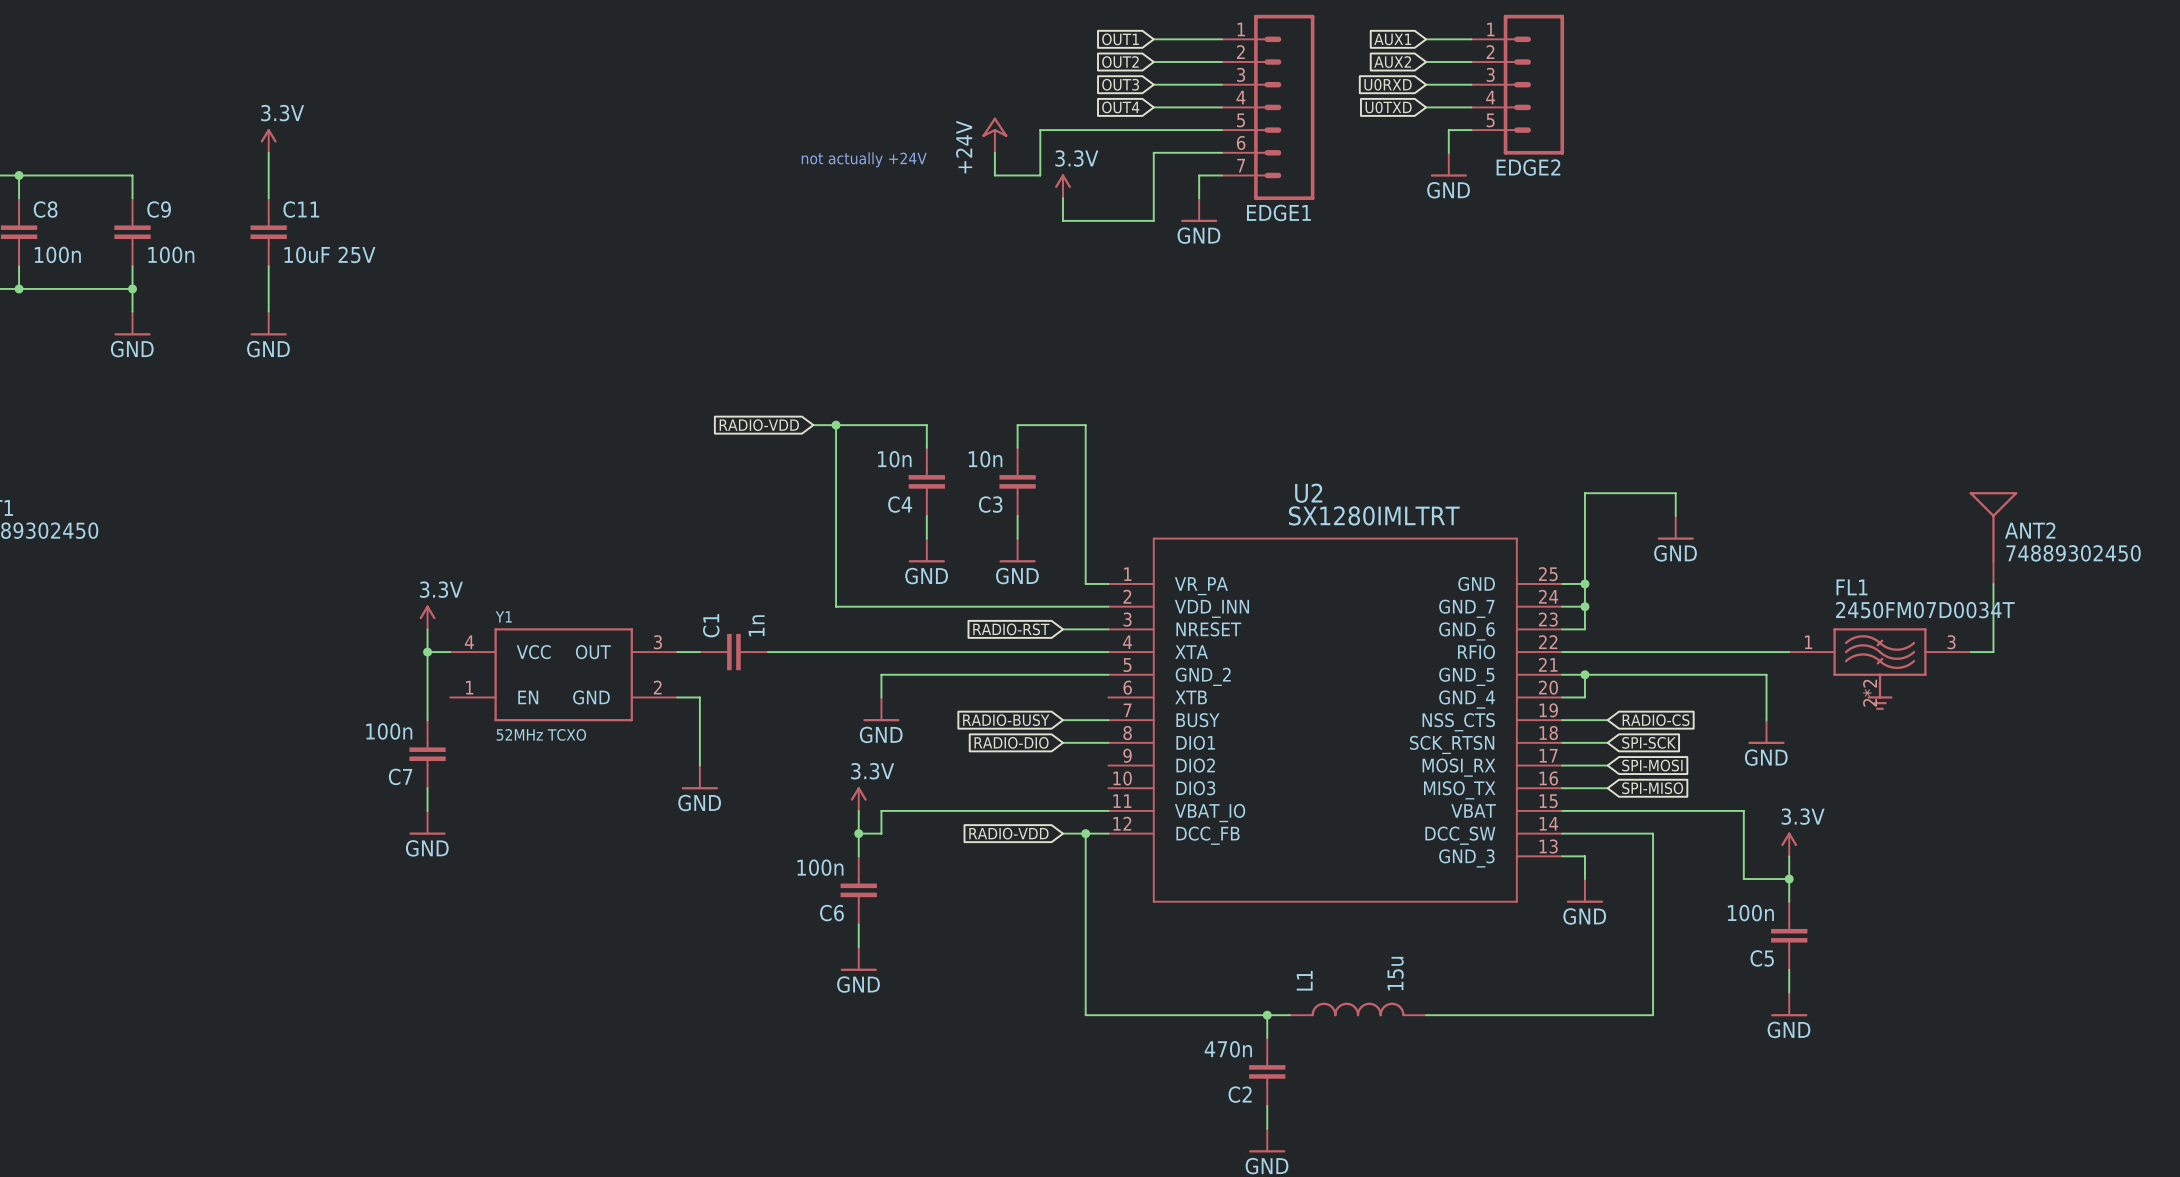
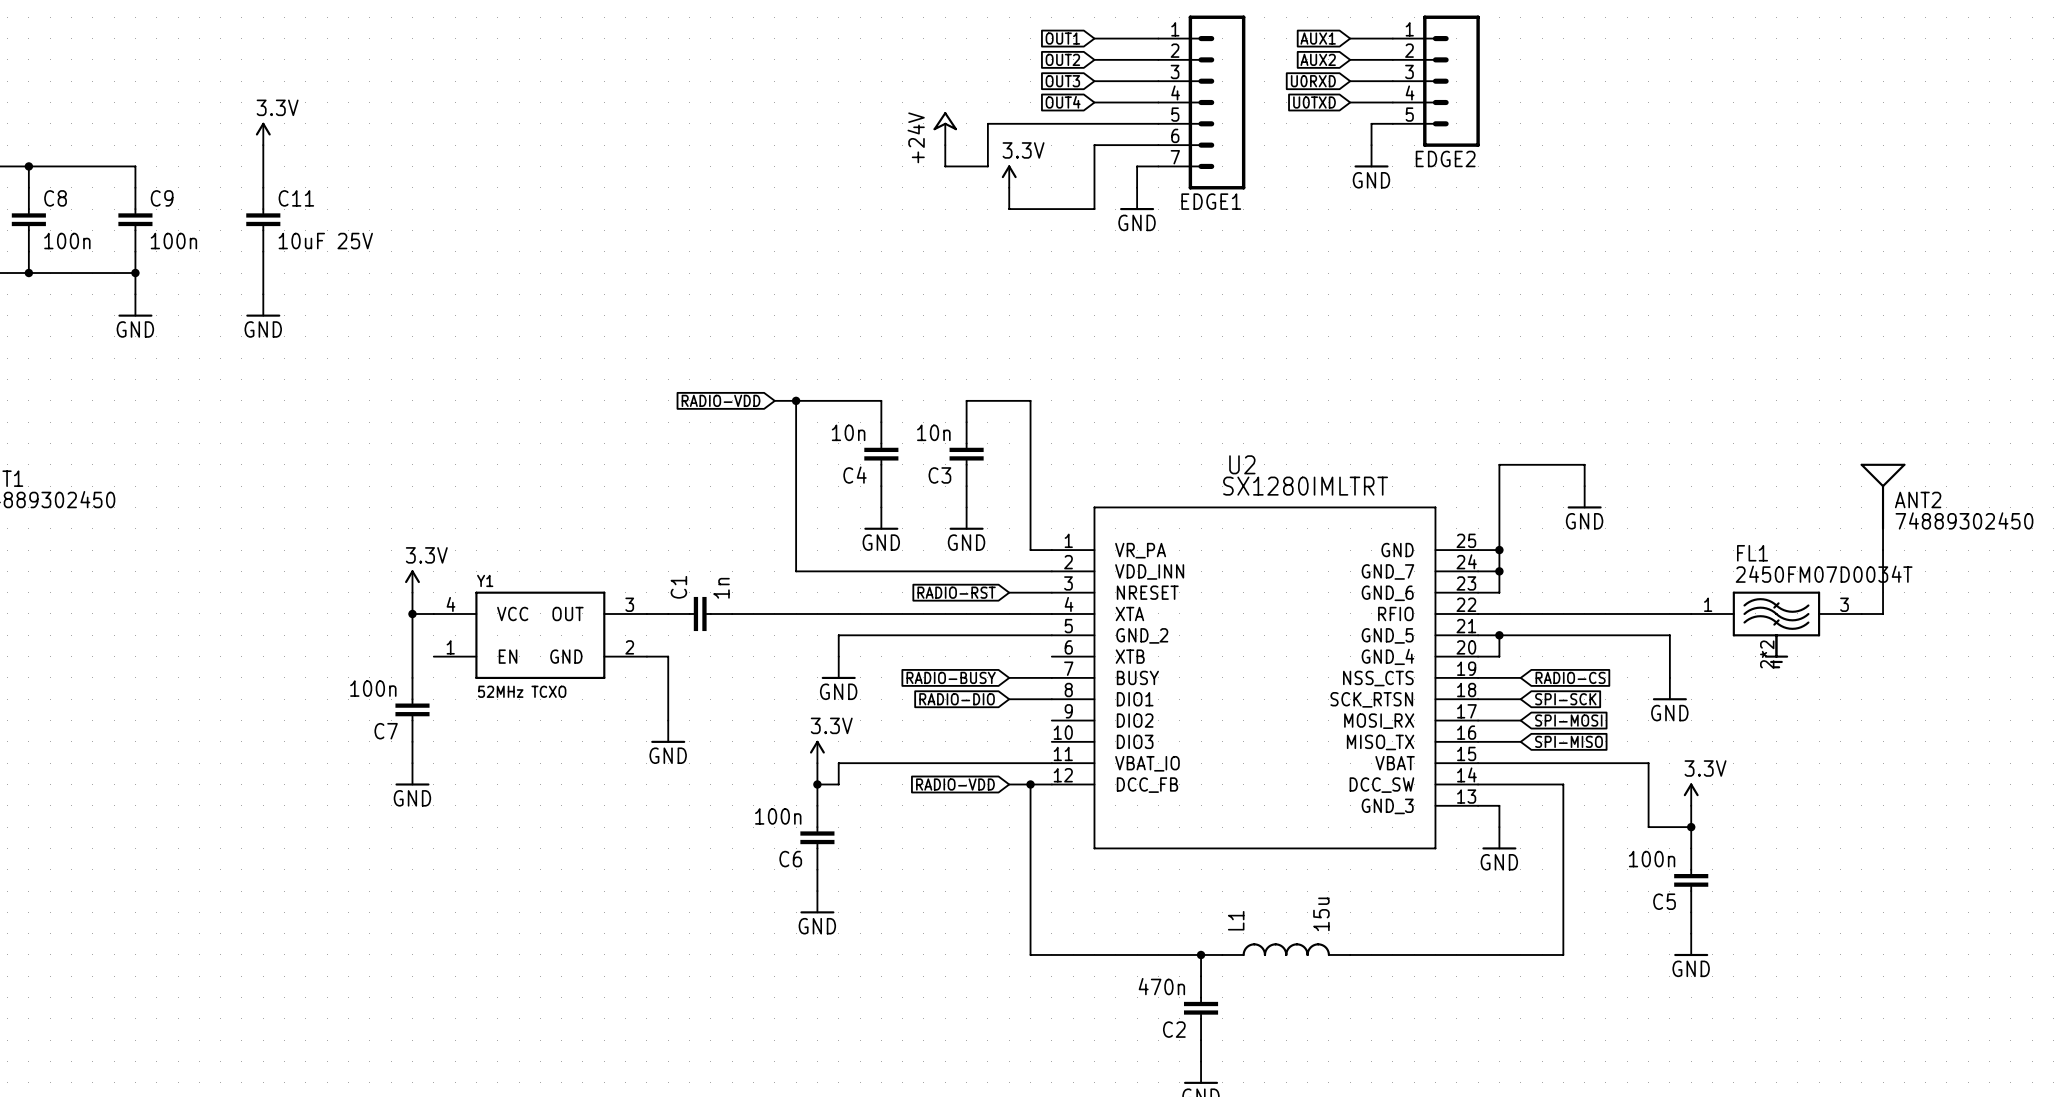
text: not actually +24V (864, 159) -> none

